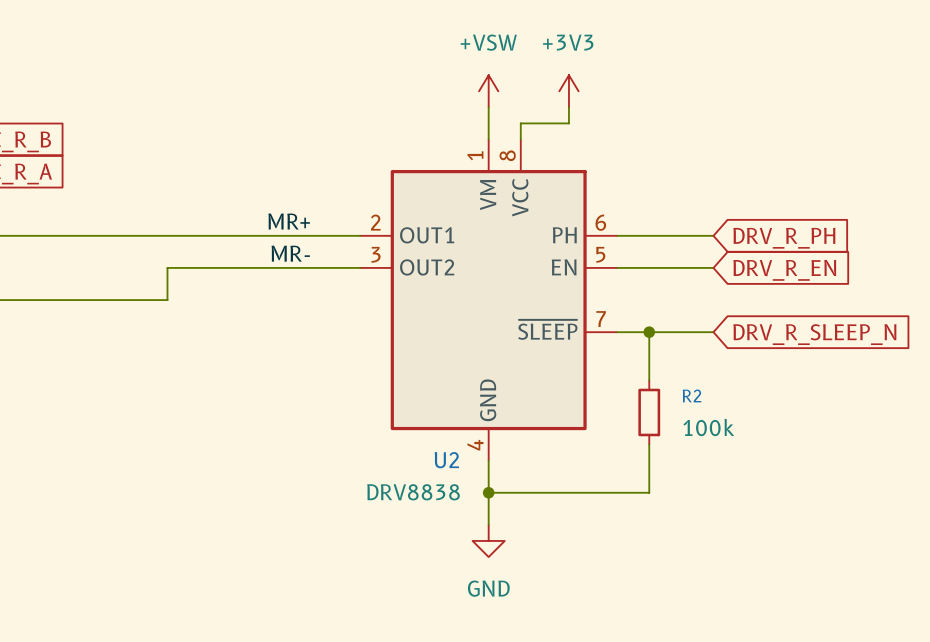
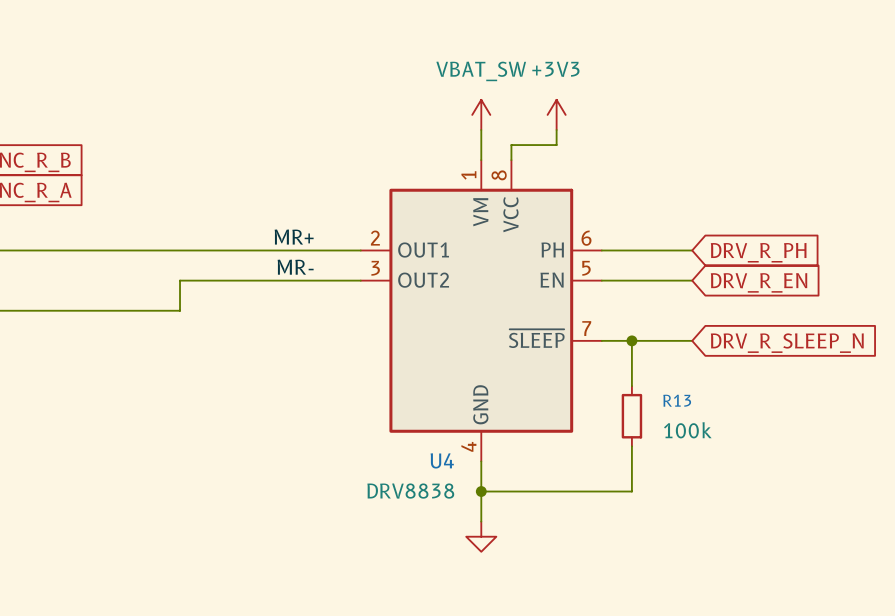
power symbol: +VSW (488, 91) -> VBAT_SW (481, 114)
R2 name: R2 (692, 395) -> R13 (677, 400)
U2 name: U2 (446, 460) -> U4 (442, 460)
power symbol text: GND (488, 588) -> none

